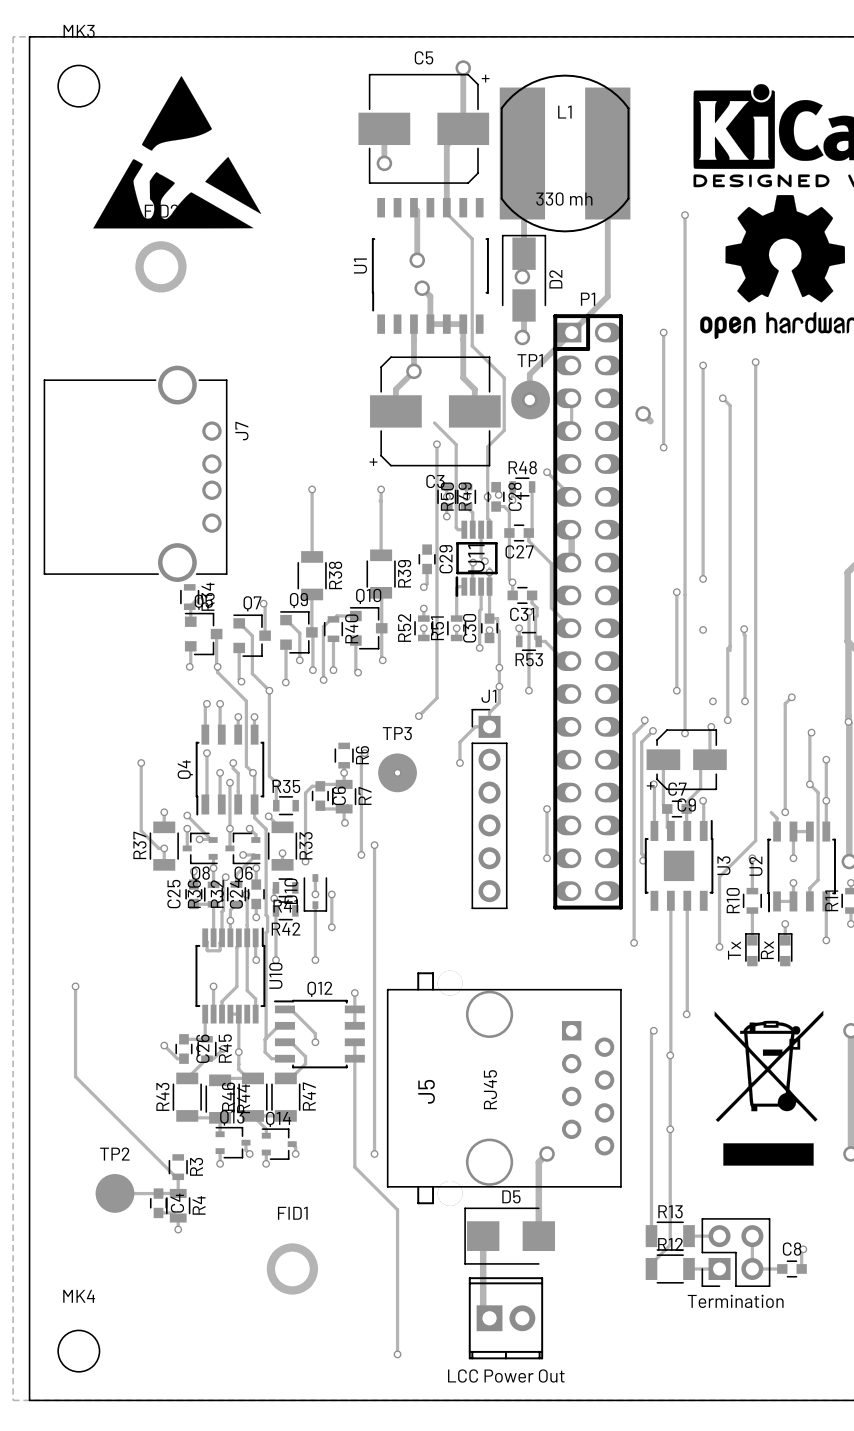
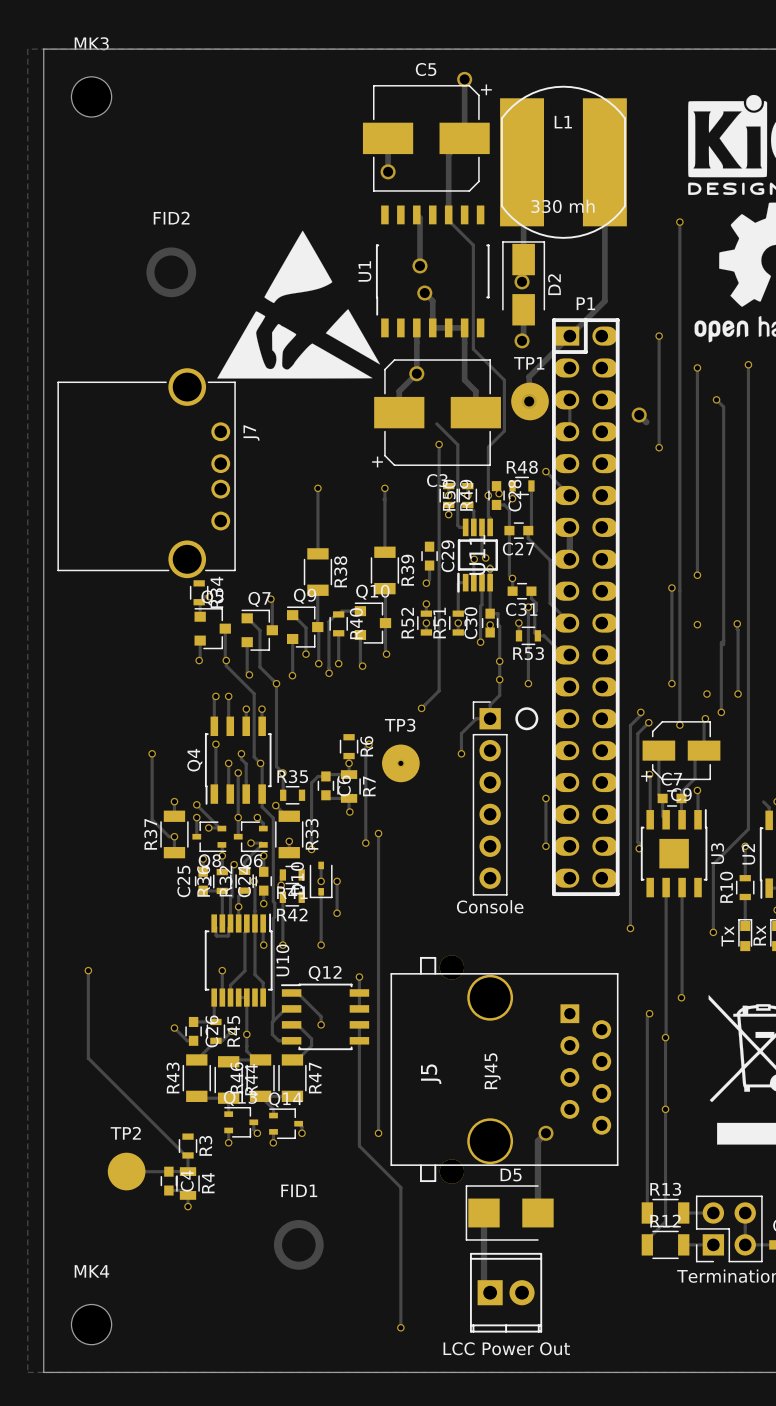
drawing position: (177, 152) -> (298, 304)
J1 name: J1 (488, 696) -> none
drawing: none -> [515, 707, 539, 731]
J1 value: none -> Console (490, 906)

